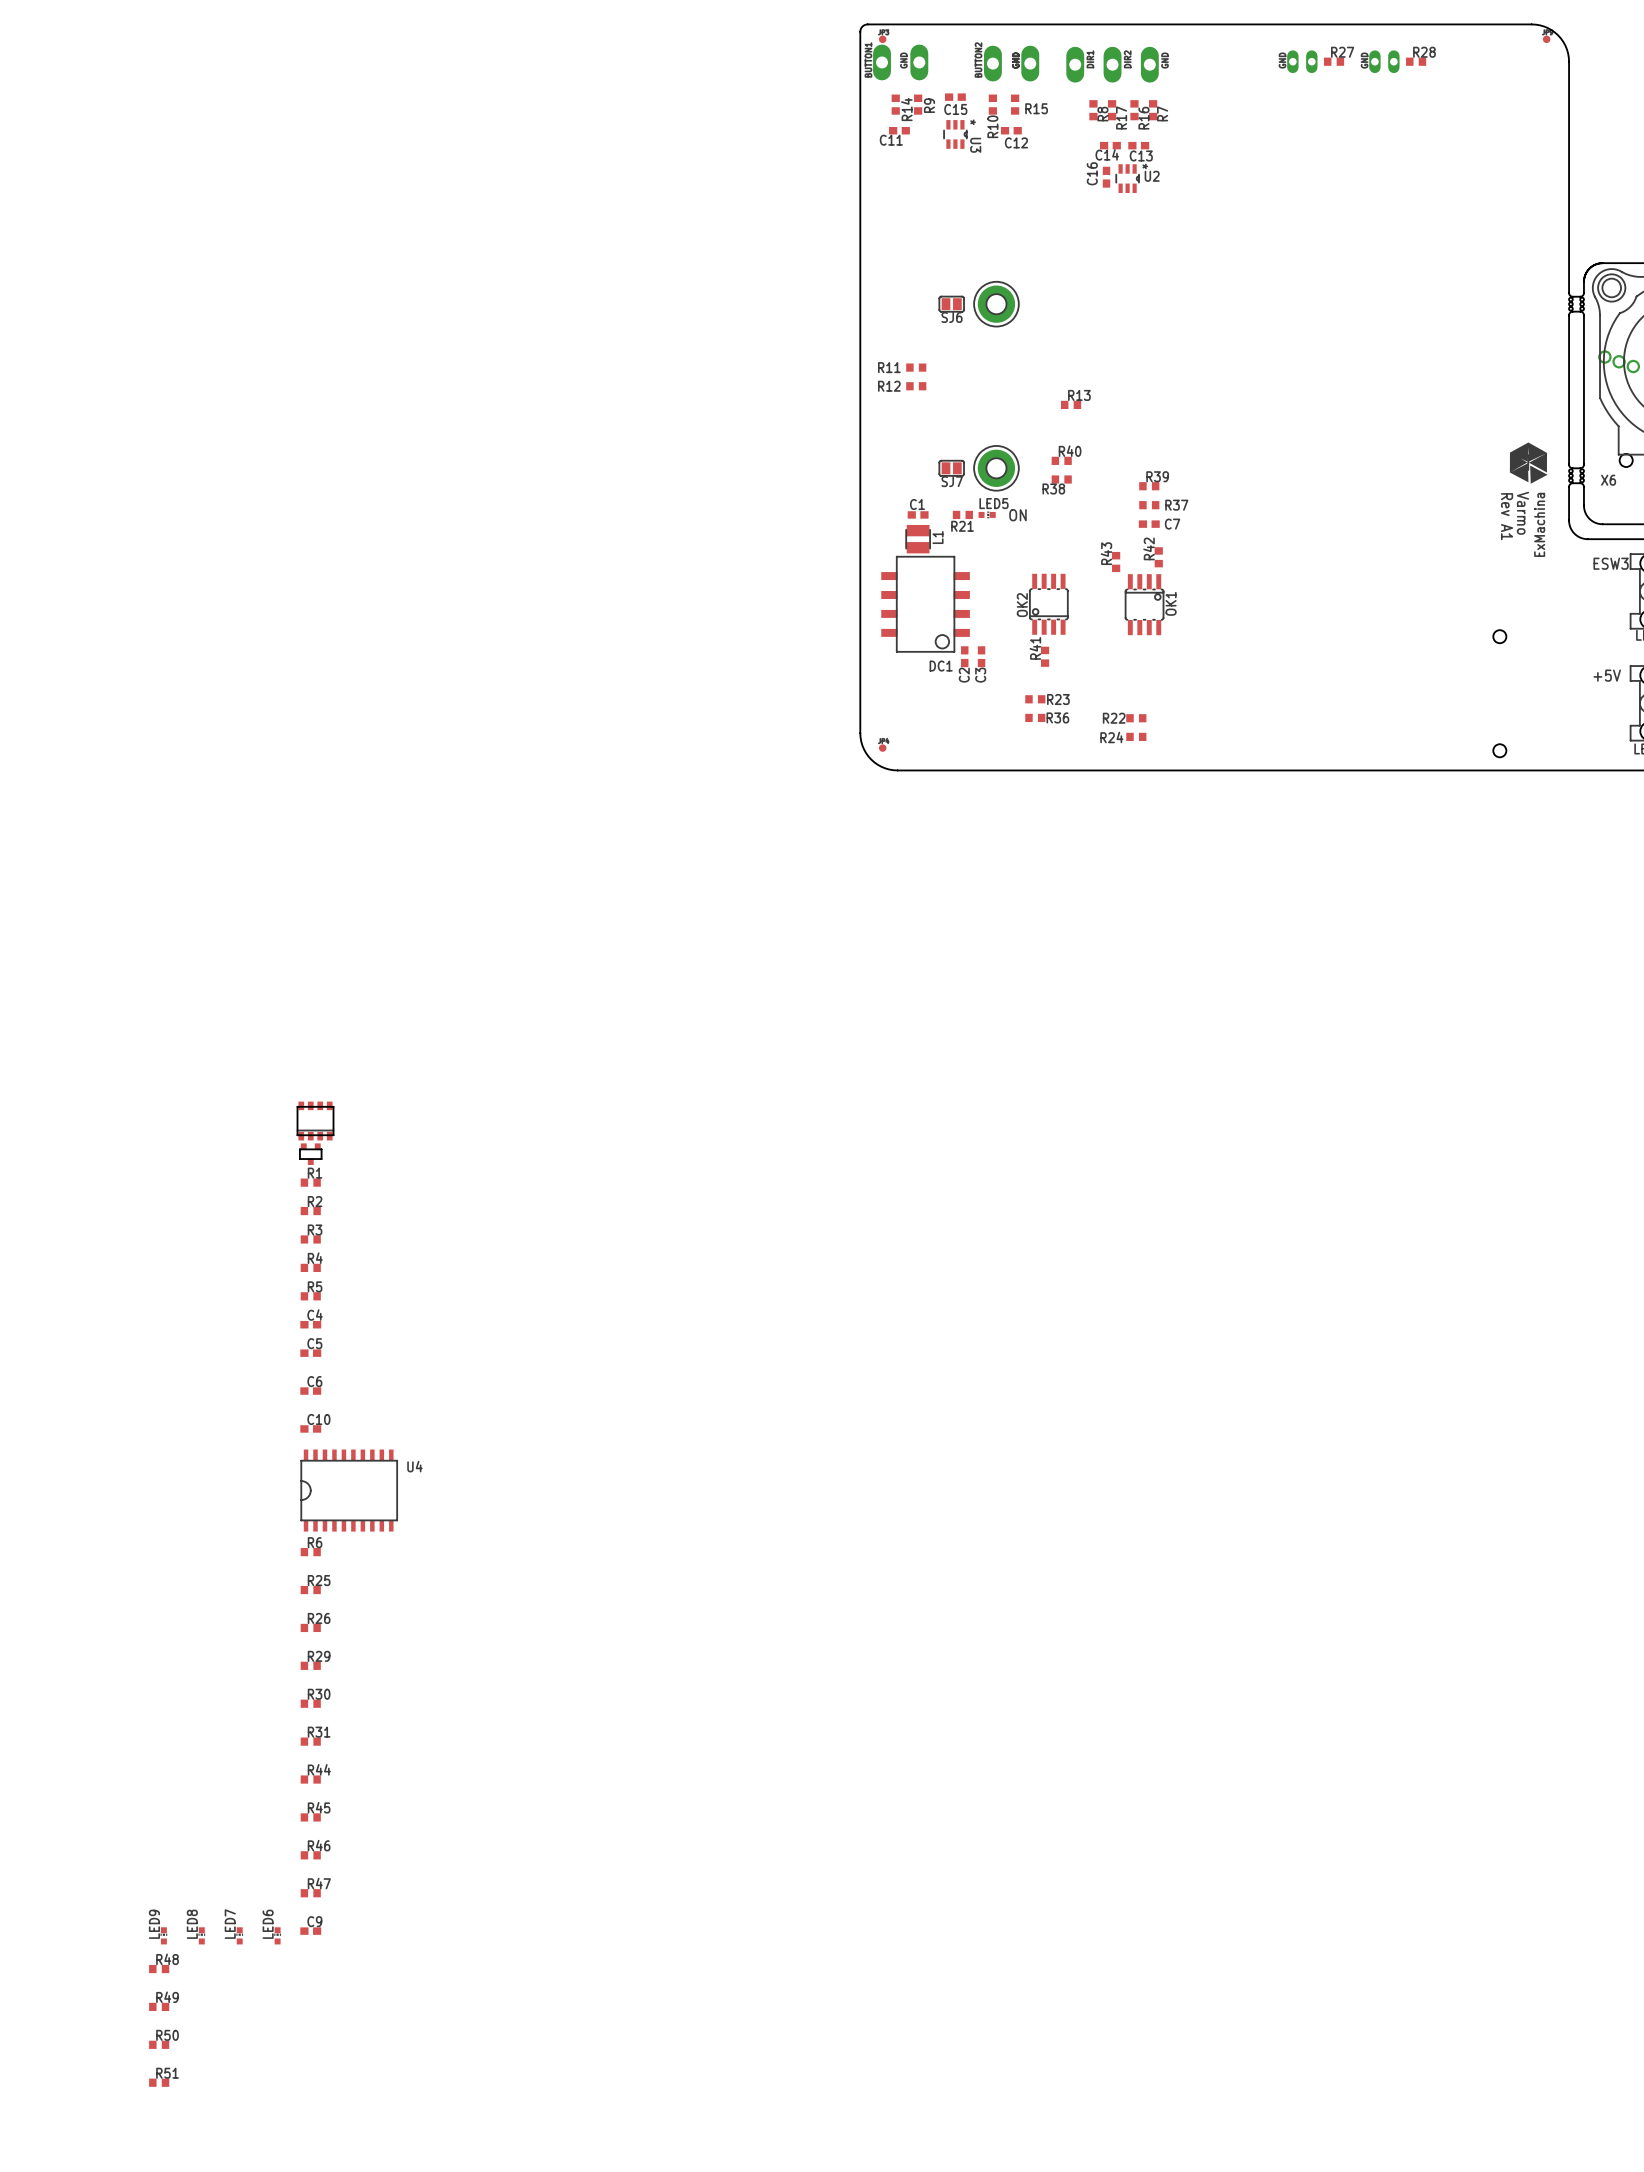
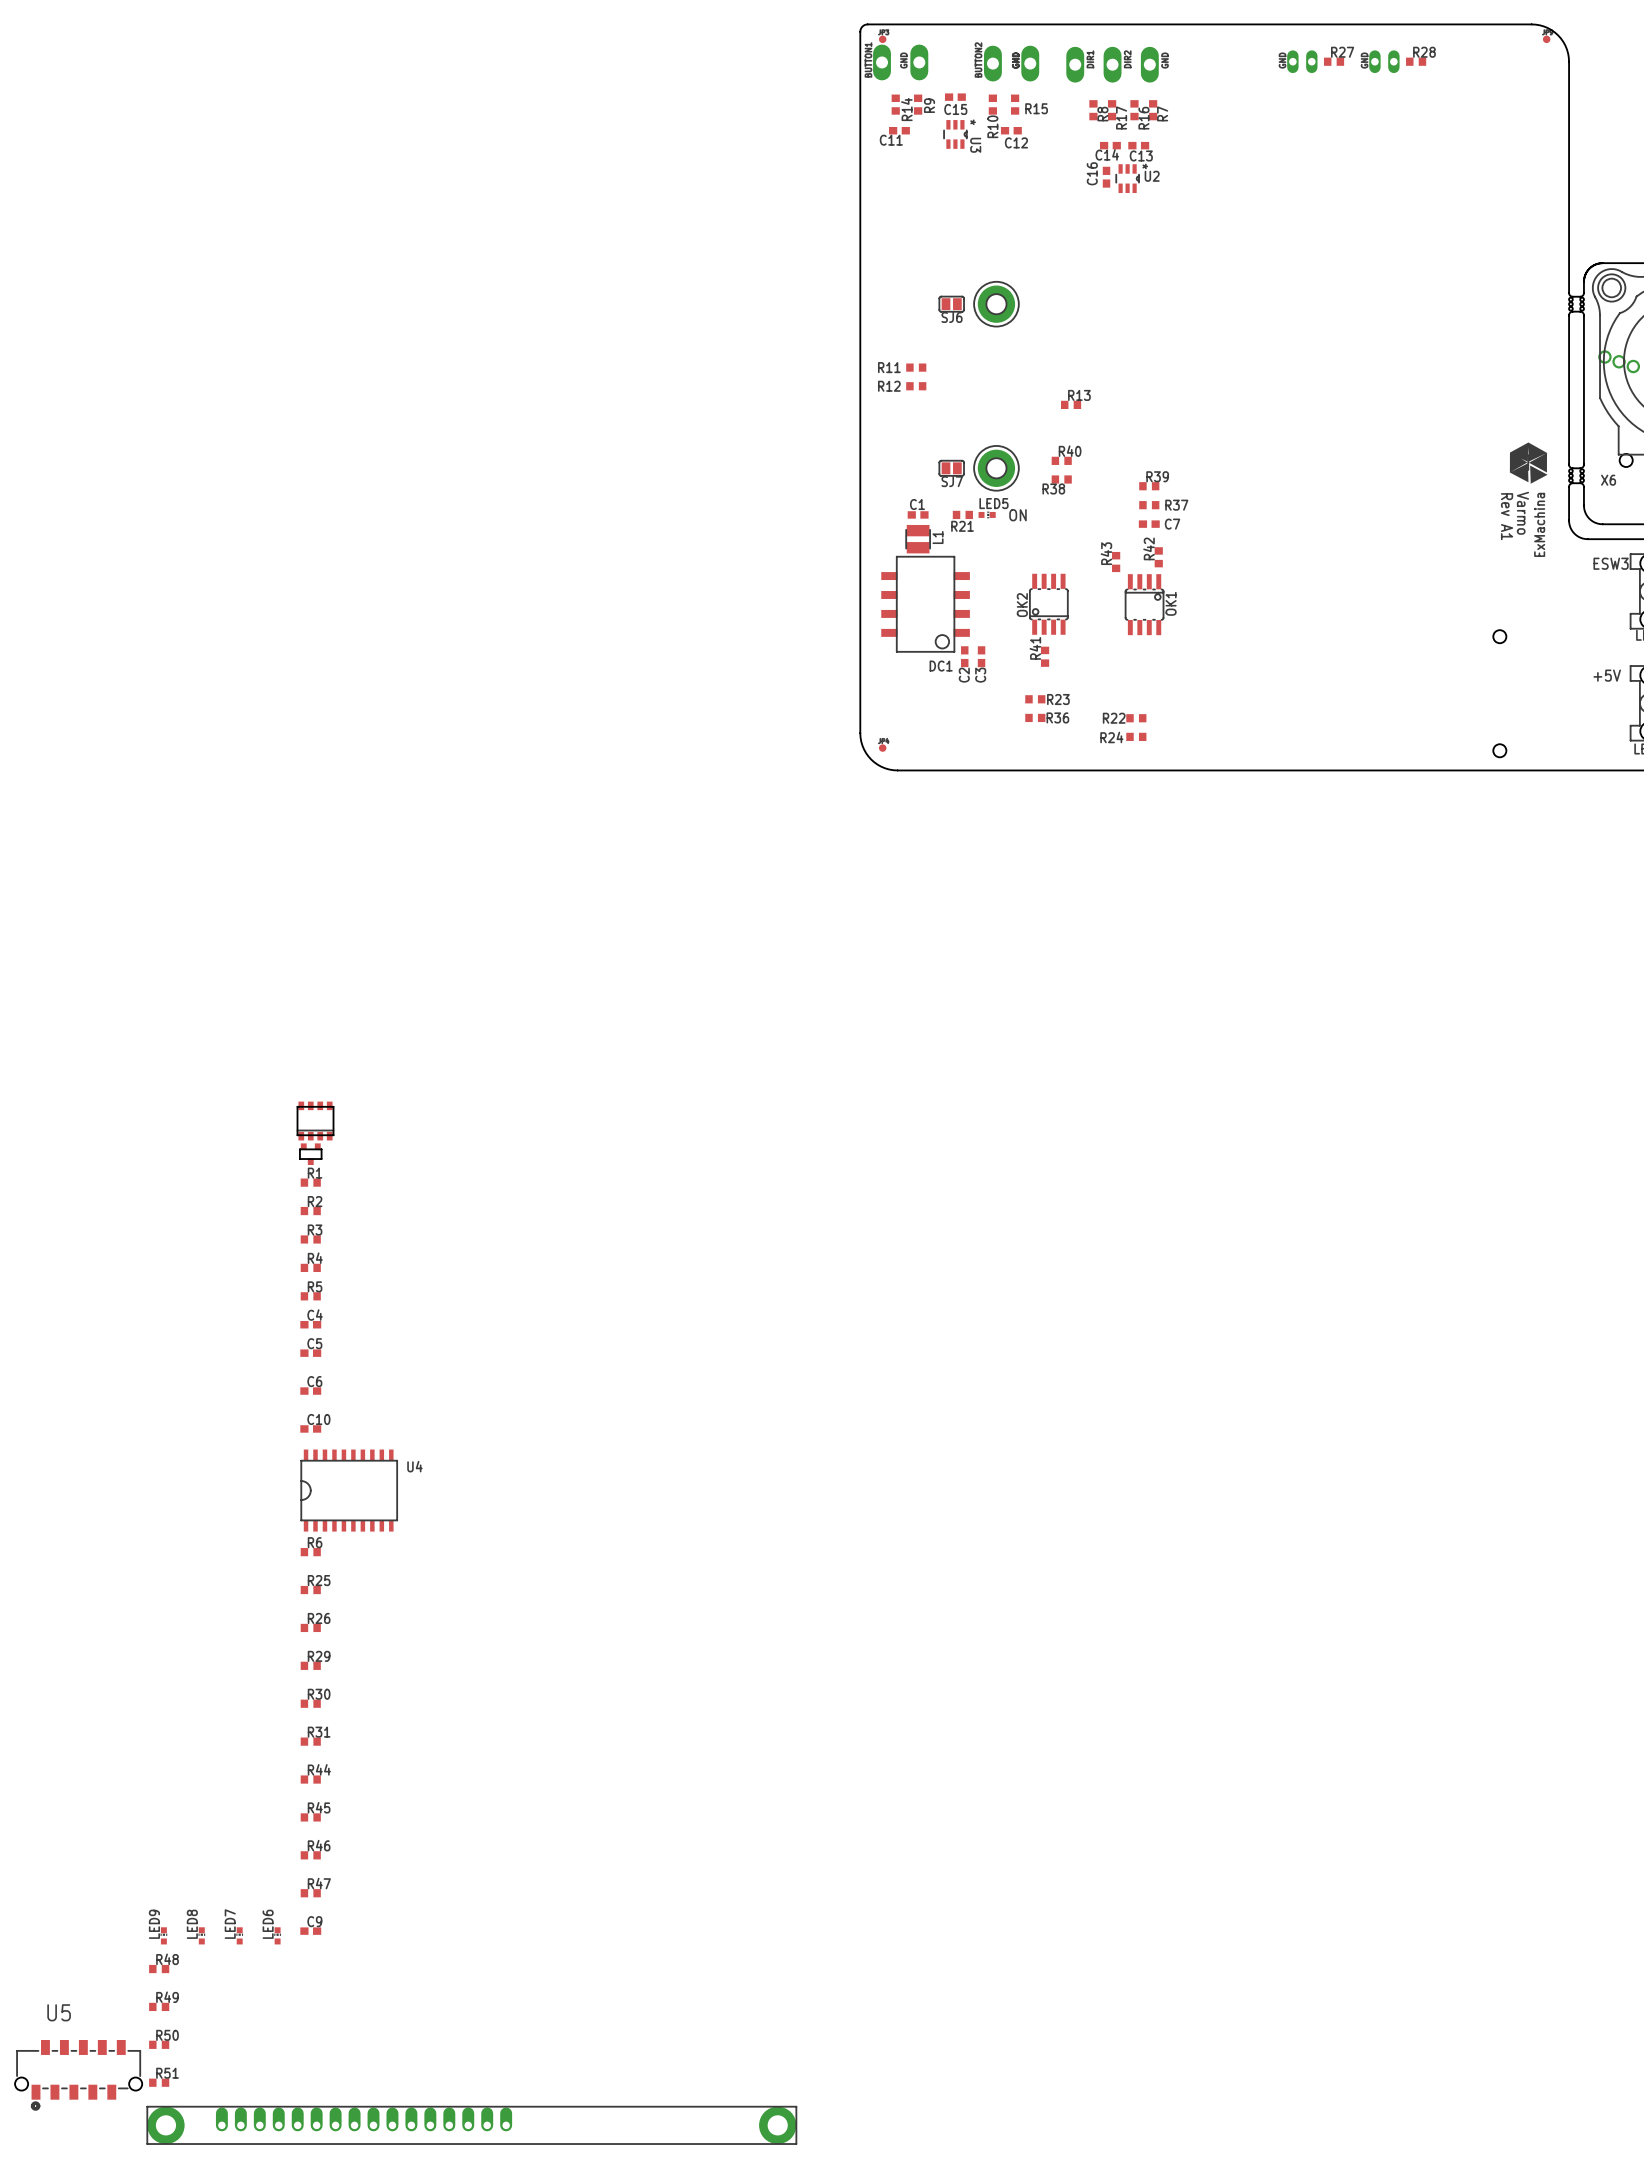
U5: none -> (78, 2075)
part: none -> (471, 2125)

